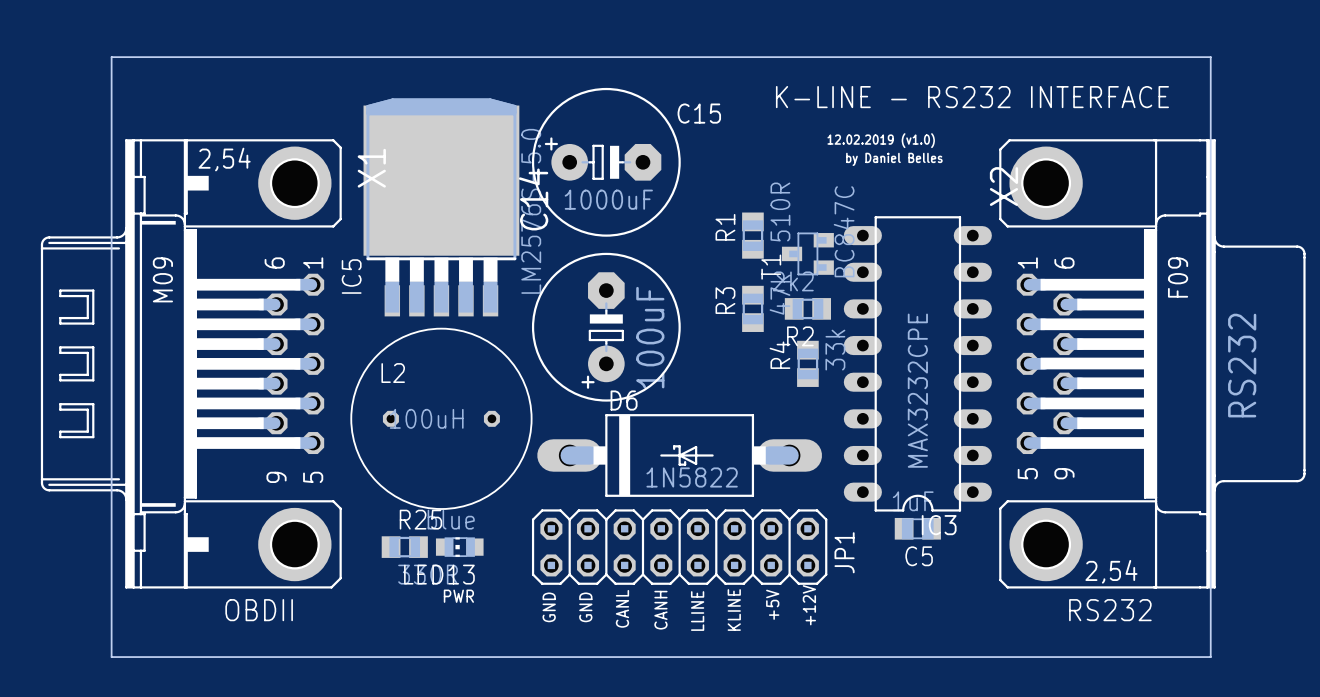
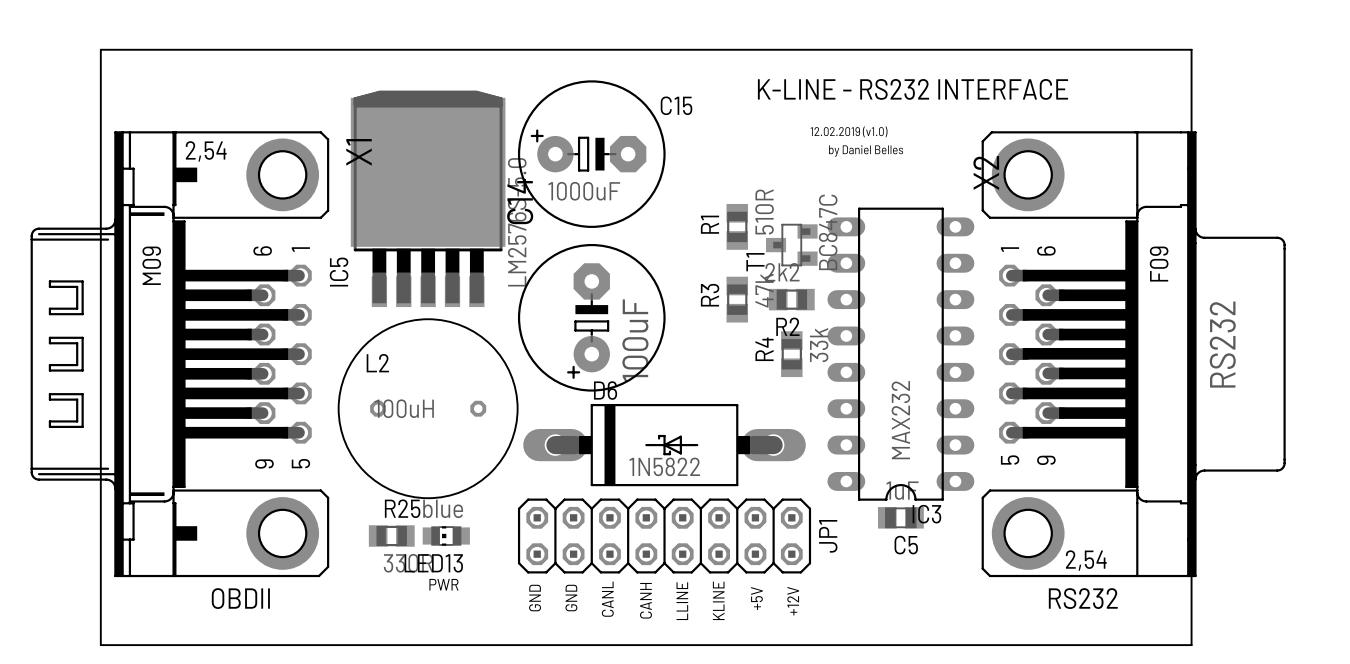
IC3 value: MAX3232CPE (917, 390) -> MAX232 (900, 420)

